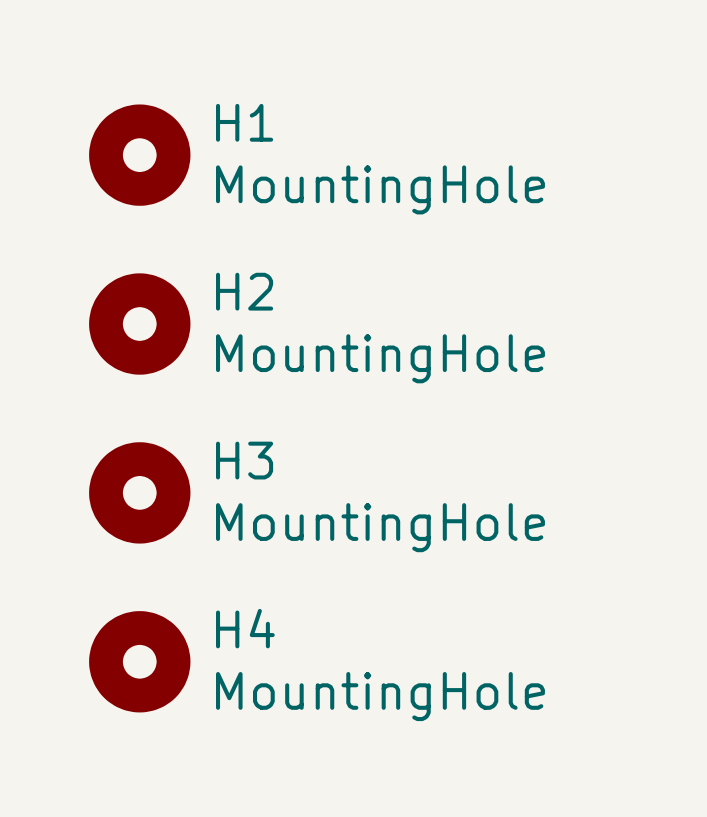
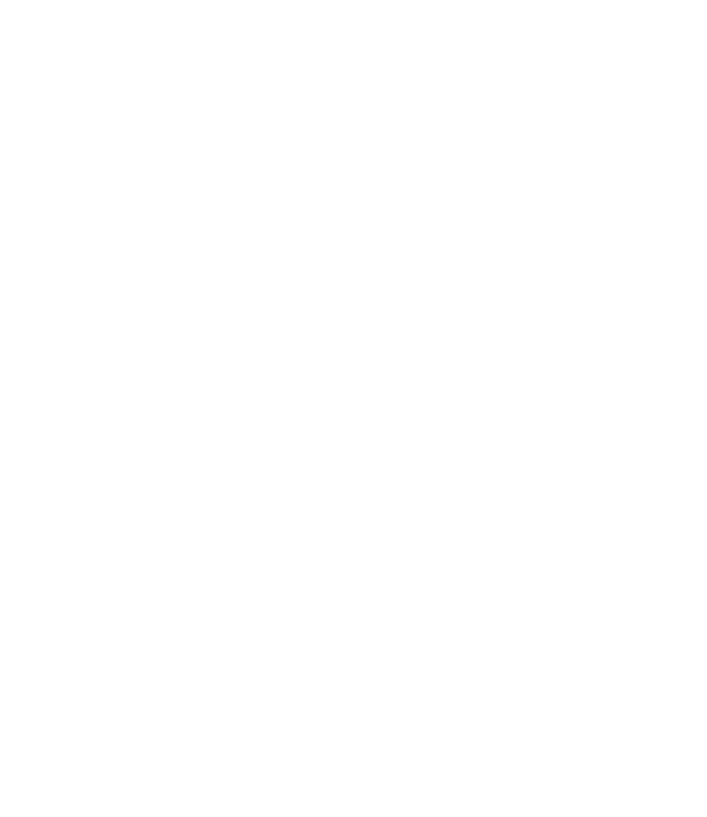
H1: MountingHole (139, 155) -> none
H2: MountingHole (139, 324) -> none
H3: MountingHole (139, 492) -> none
H4: MountingHole (139, 661) -> none

